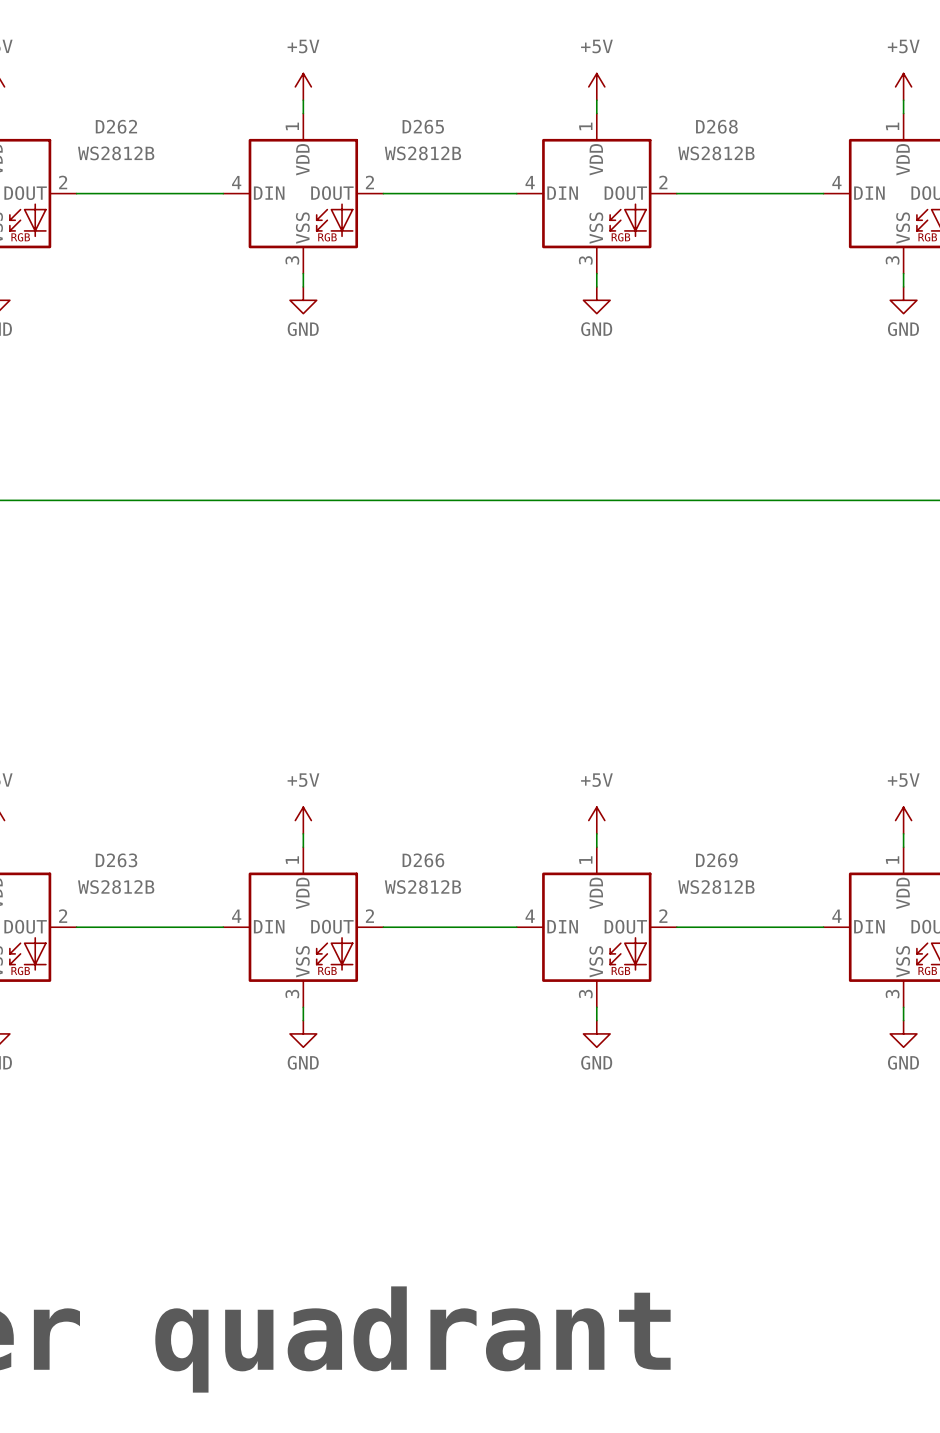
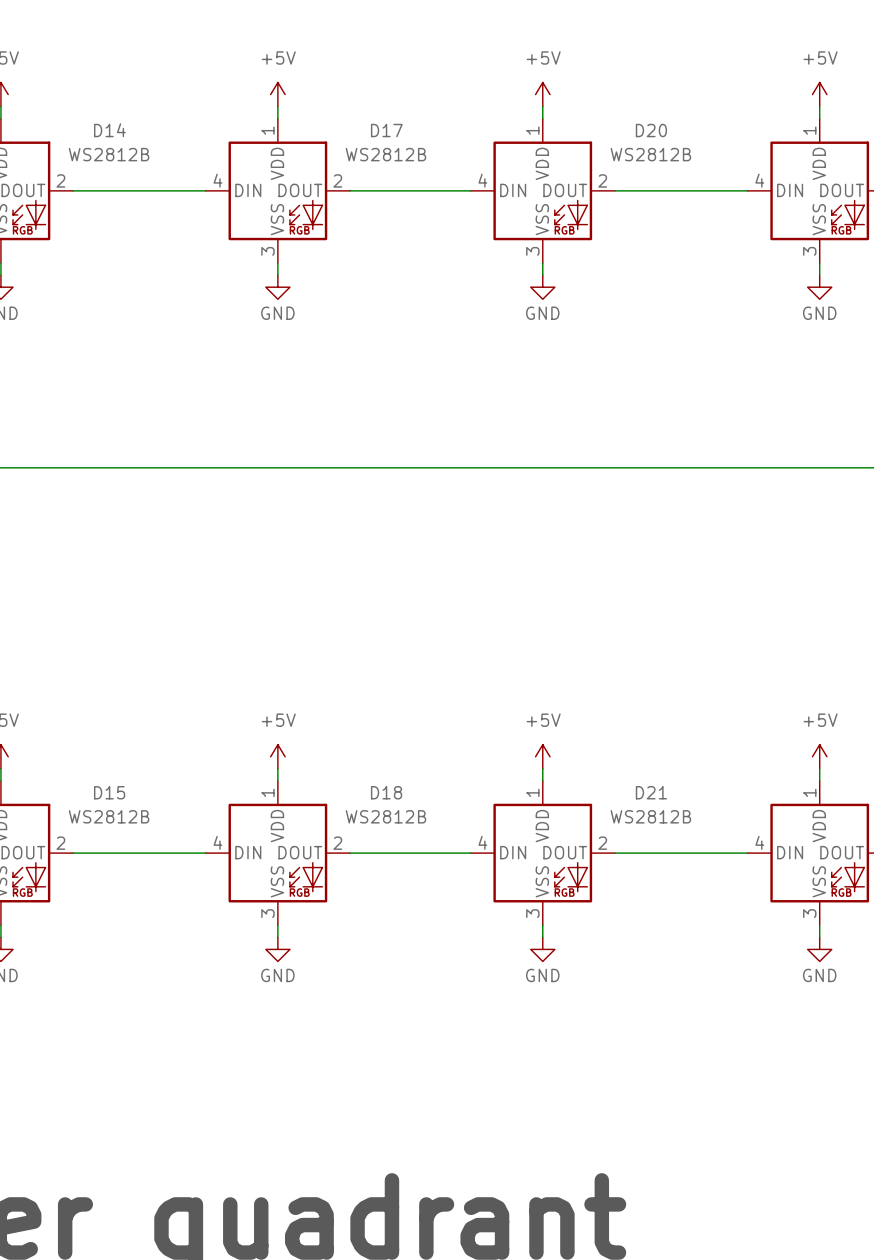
D262 name: D262 (116, 126) -> D14 (109, 130)
D265 name: D265 (423, 126) -> D17 (386, 130)
D268 name: D268 (716, 126) -> D20 (651, 130)
D263 name: D263 (116, 860) -> D15 (109, 792)
D266 name: D266 (423, 860) -> D18 (386, 792)
D269 name: D269 (716, 860) -> D21 (651, 792)

